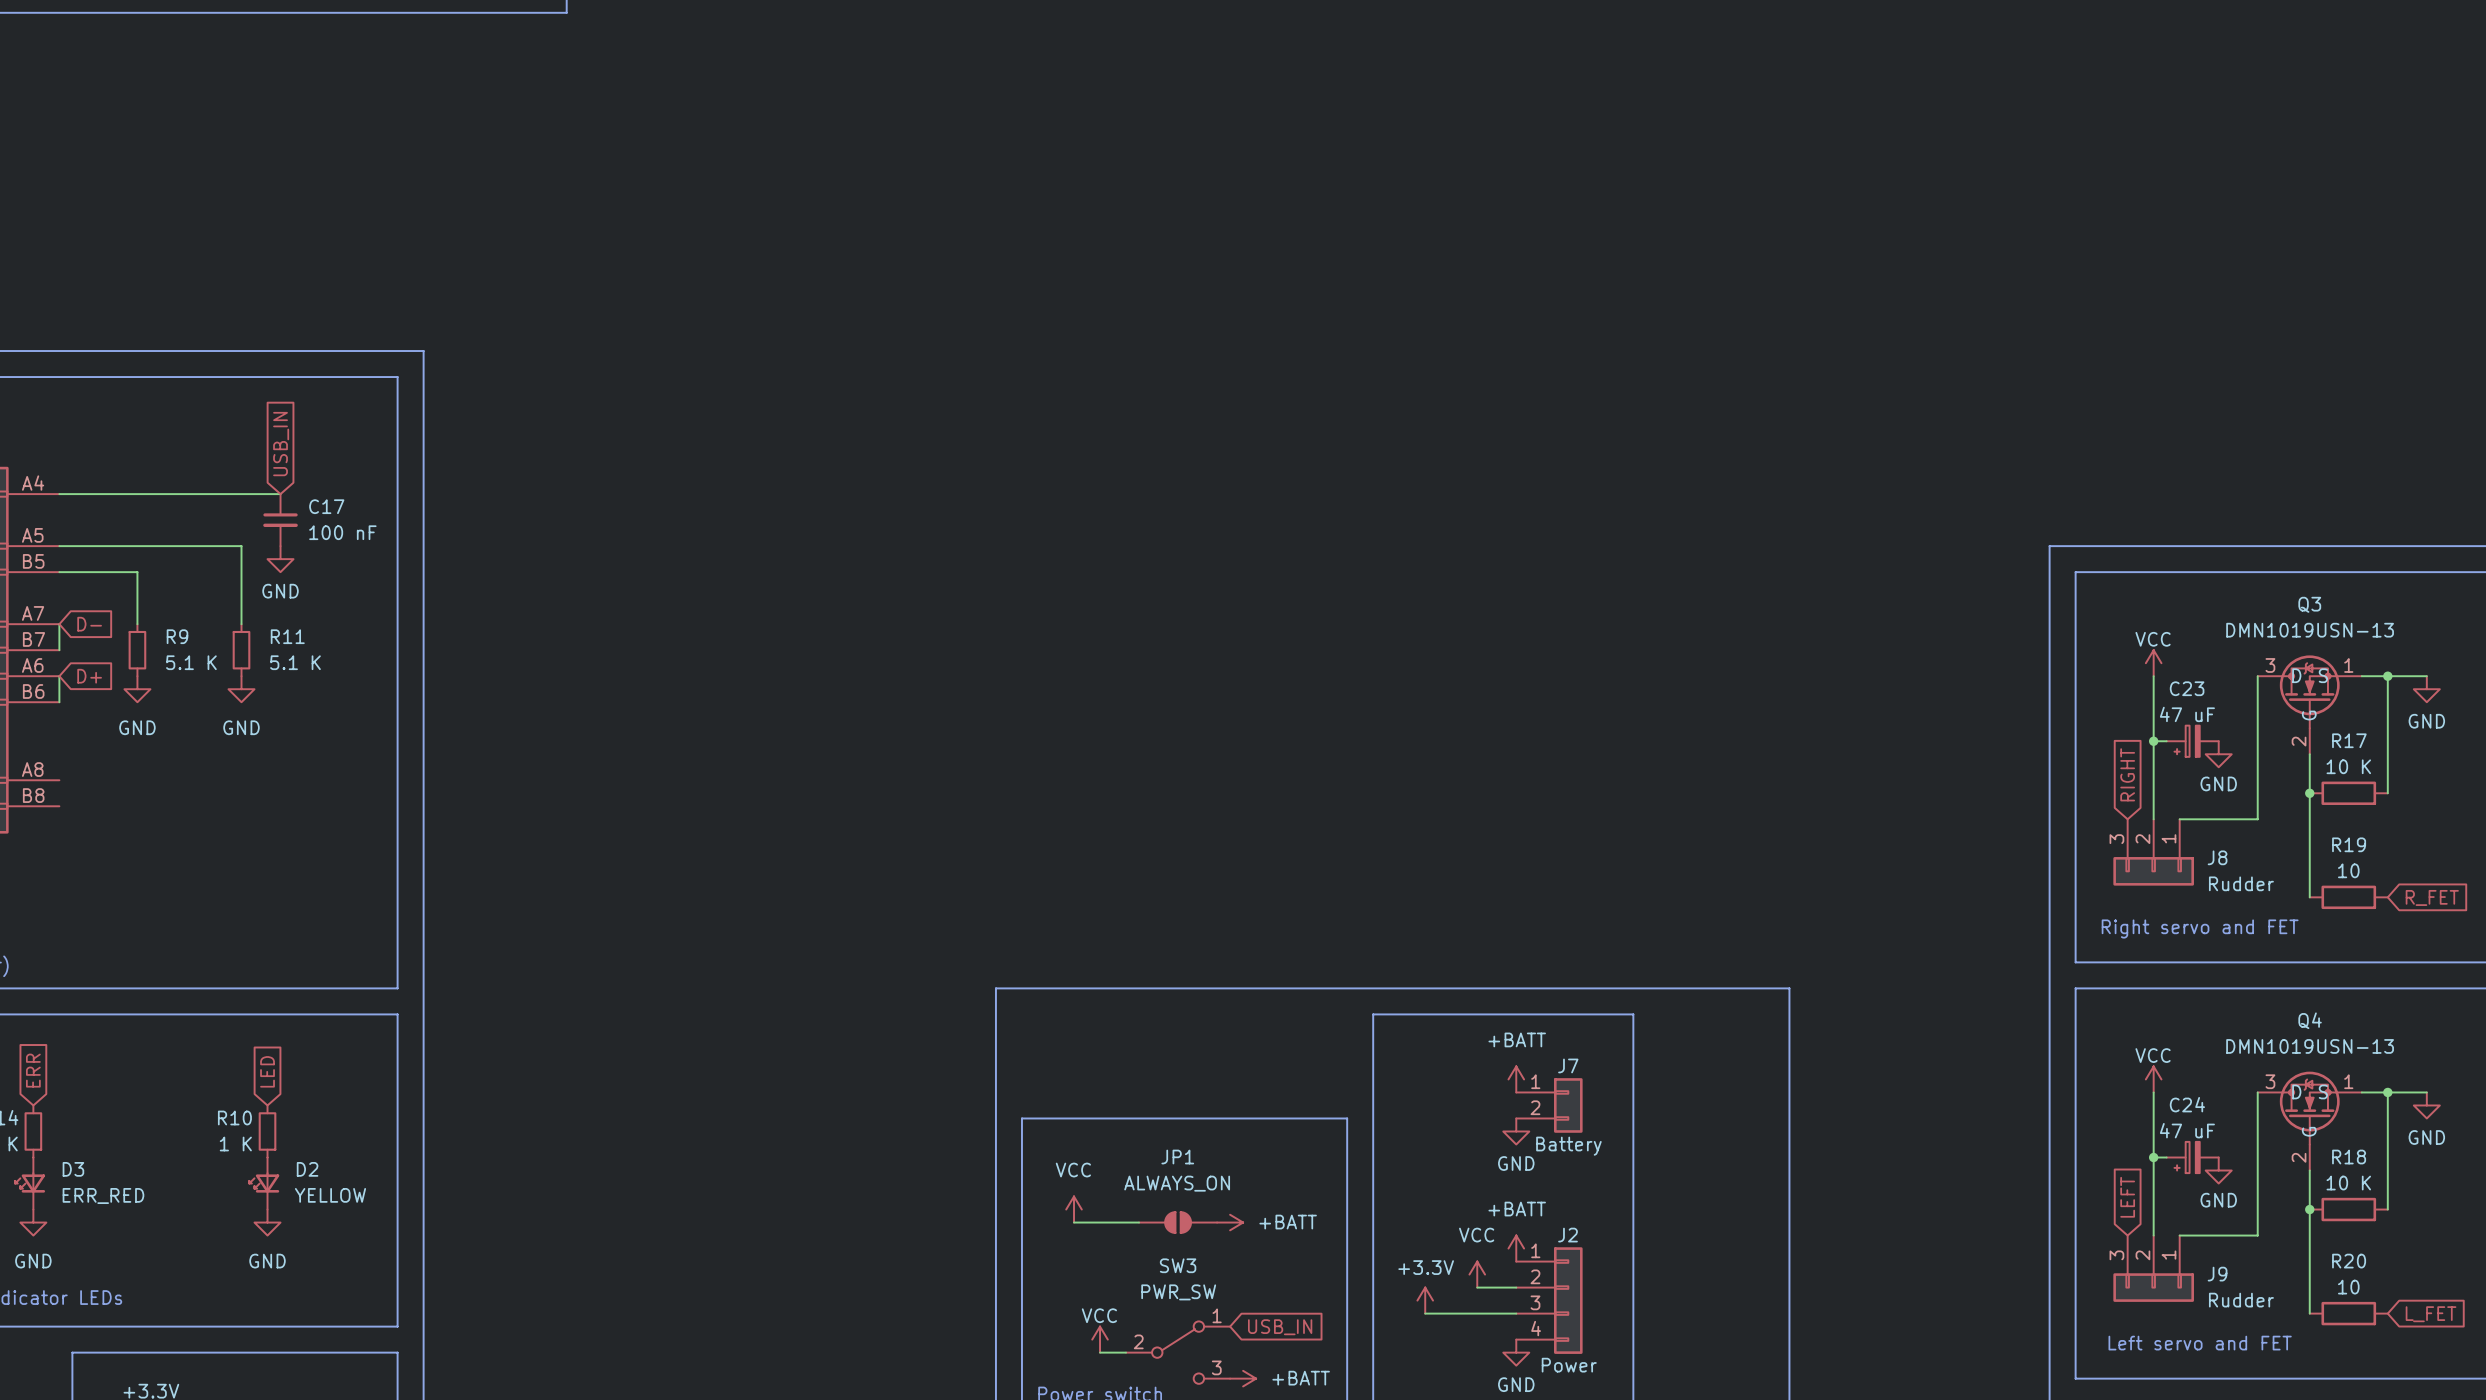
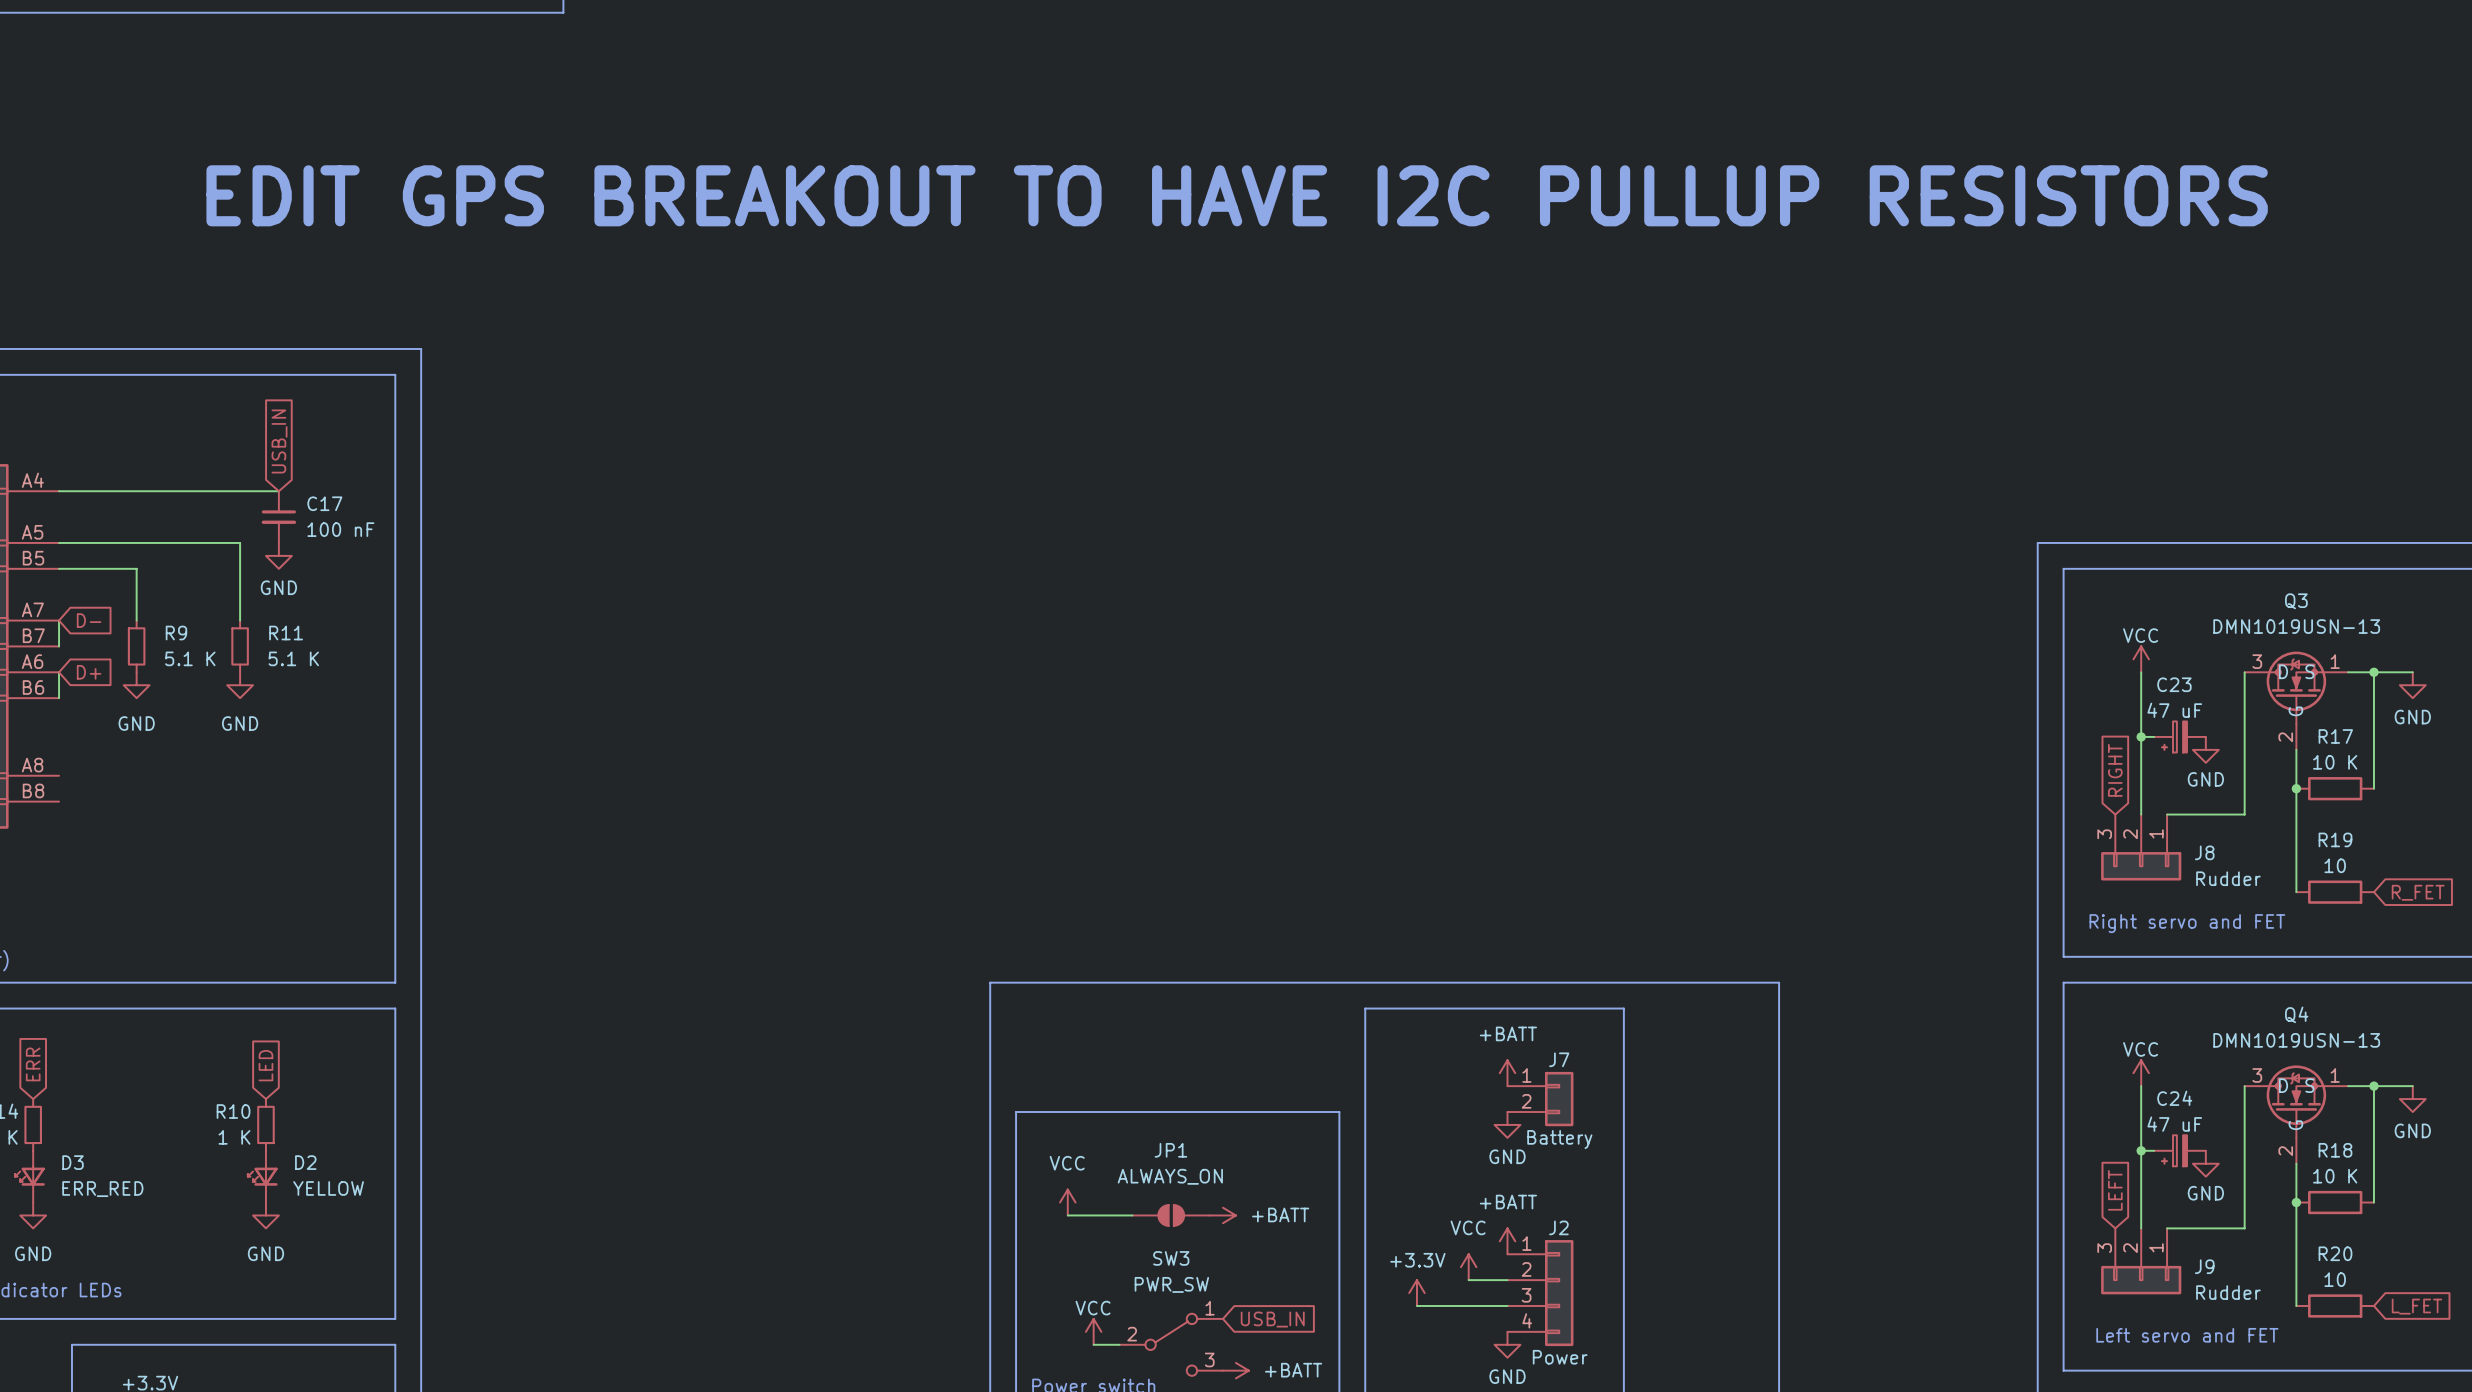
text: none -> EDIT GPS BREAKOUT TO HAVE I2C PULLUP RESISTORS (1237, 195)

